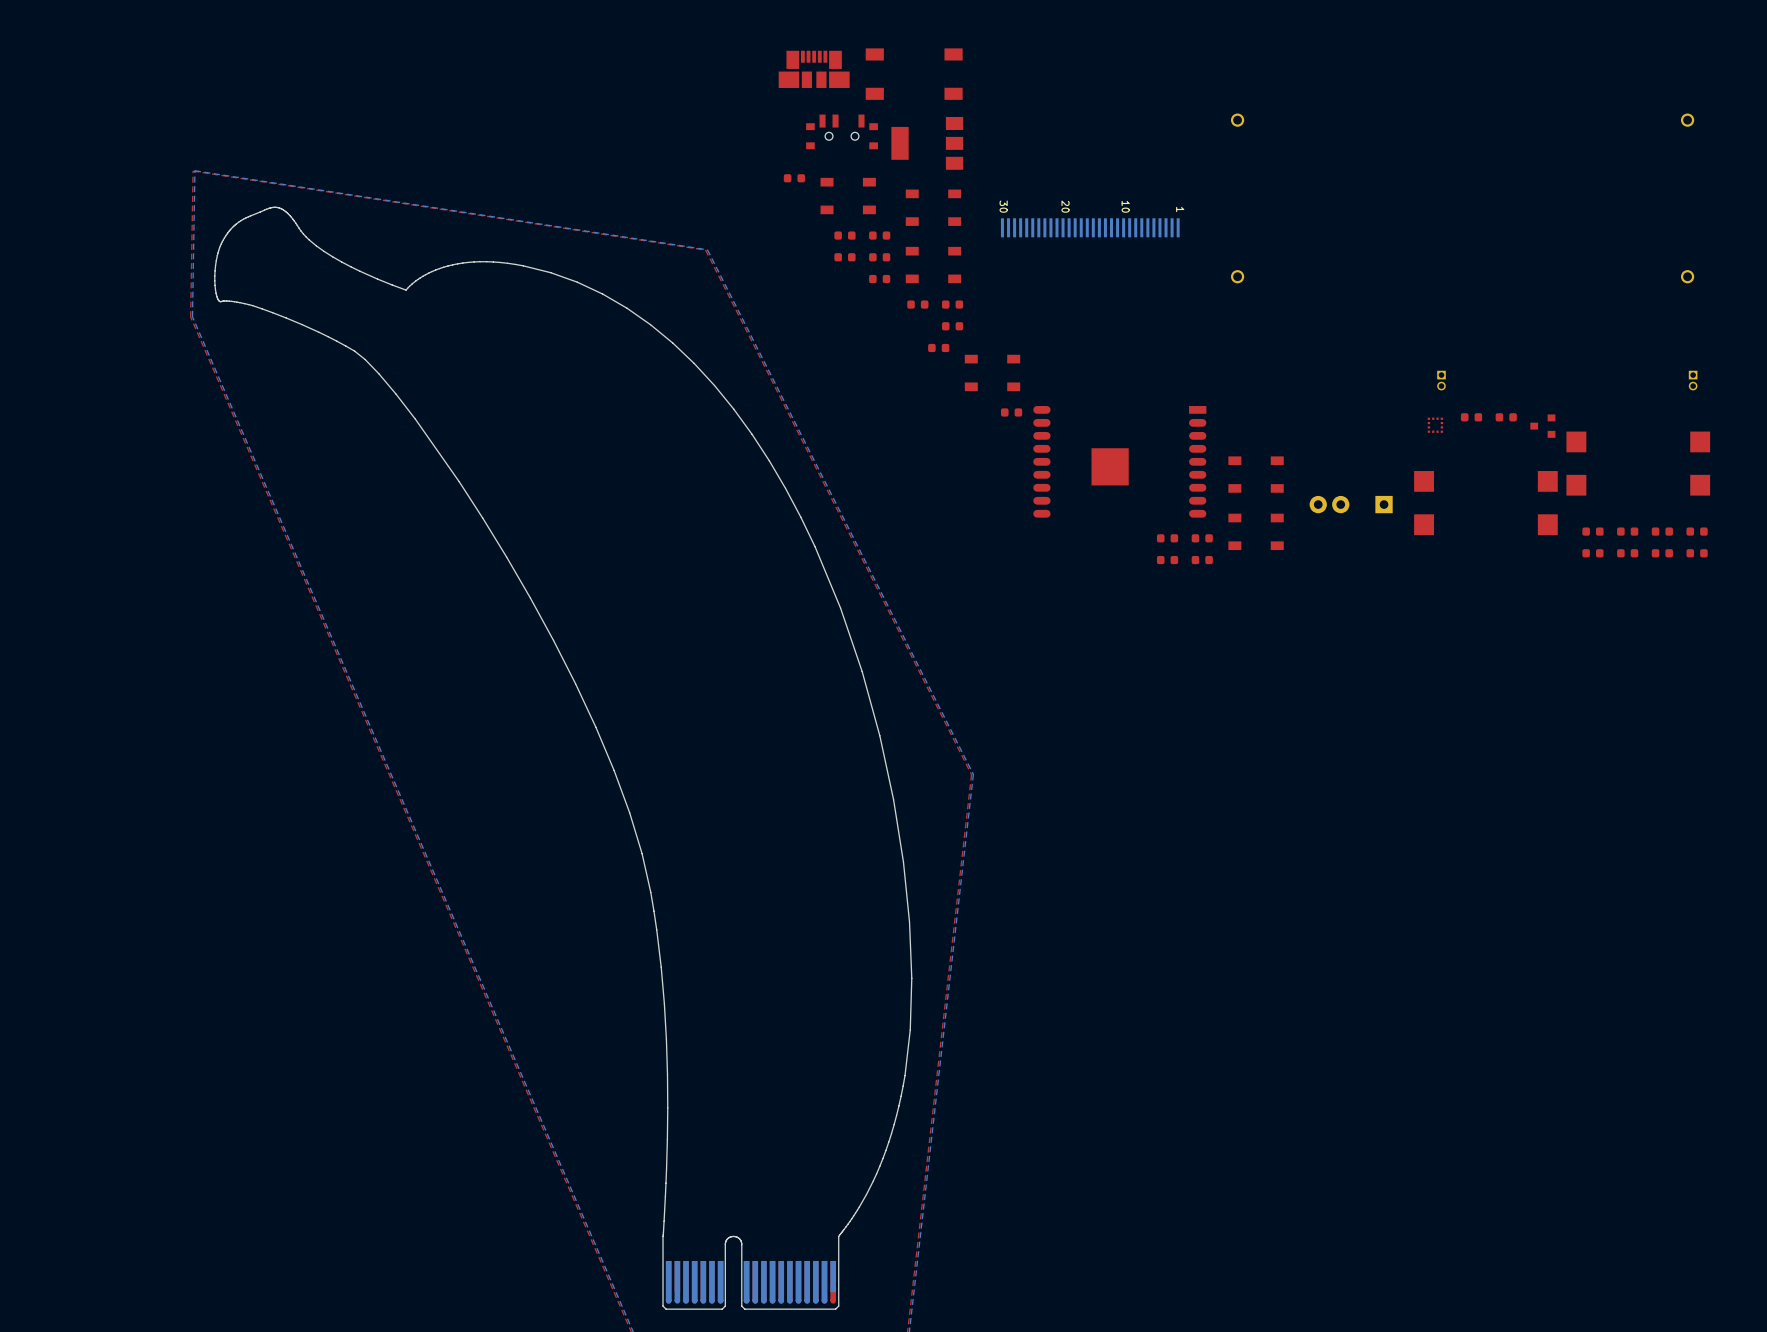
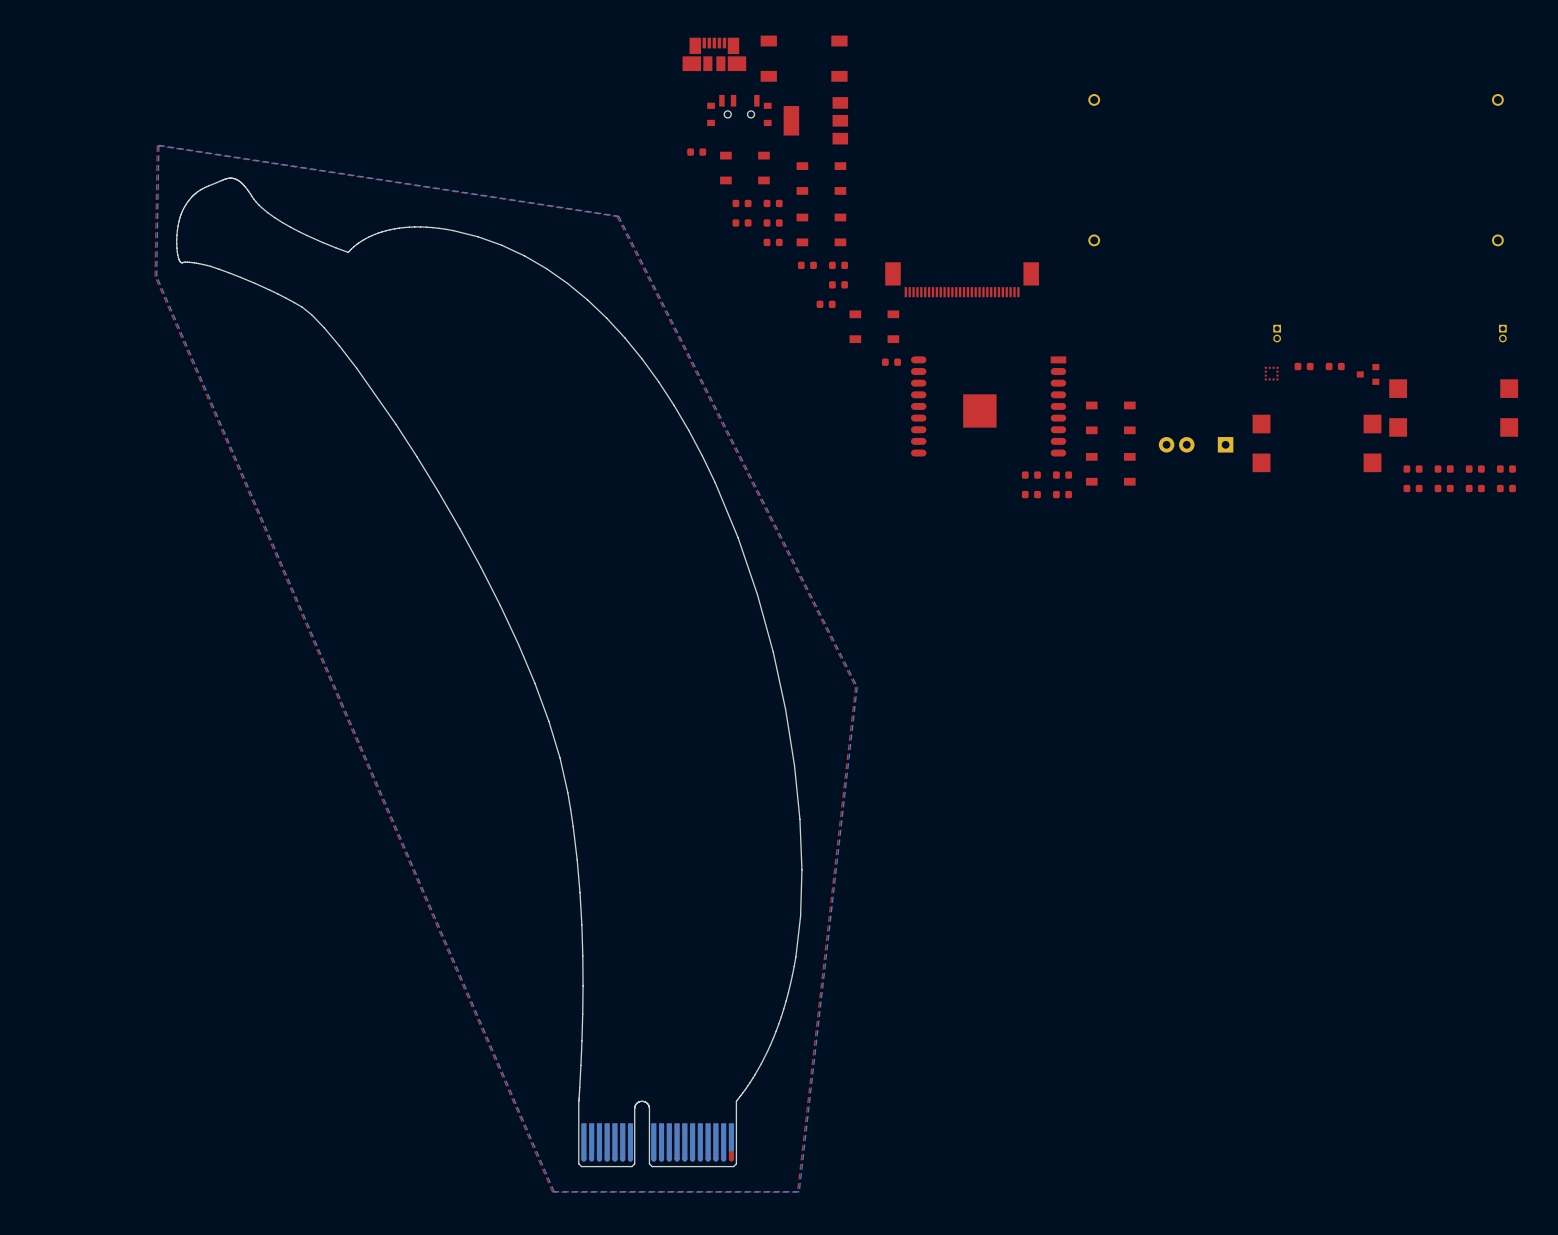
part: (1090, 227) -> none
part: none -> (962, 279)

